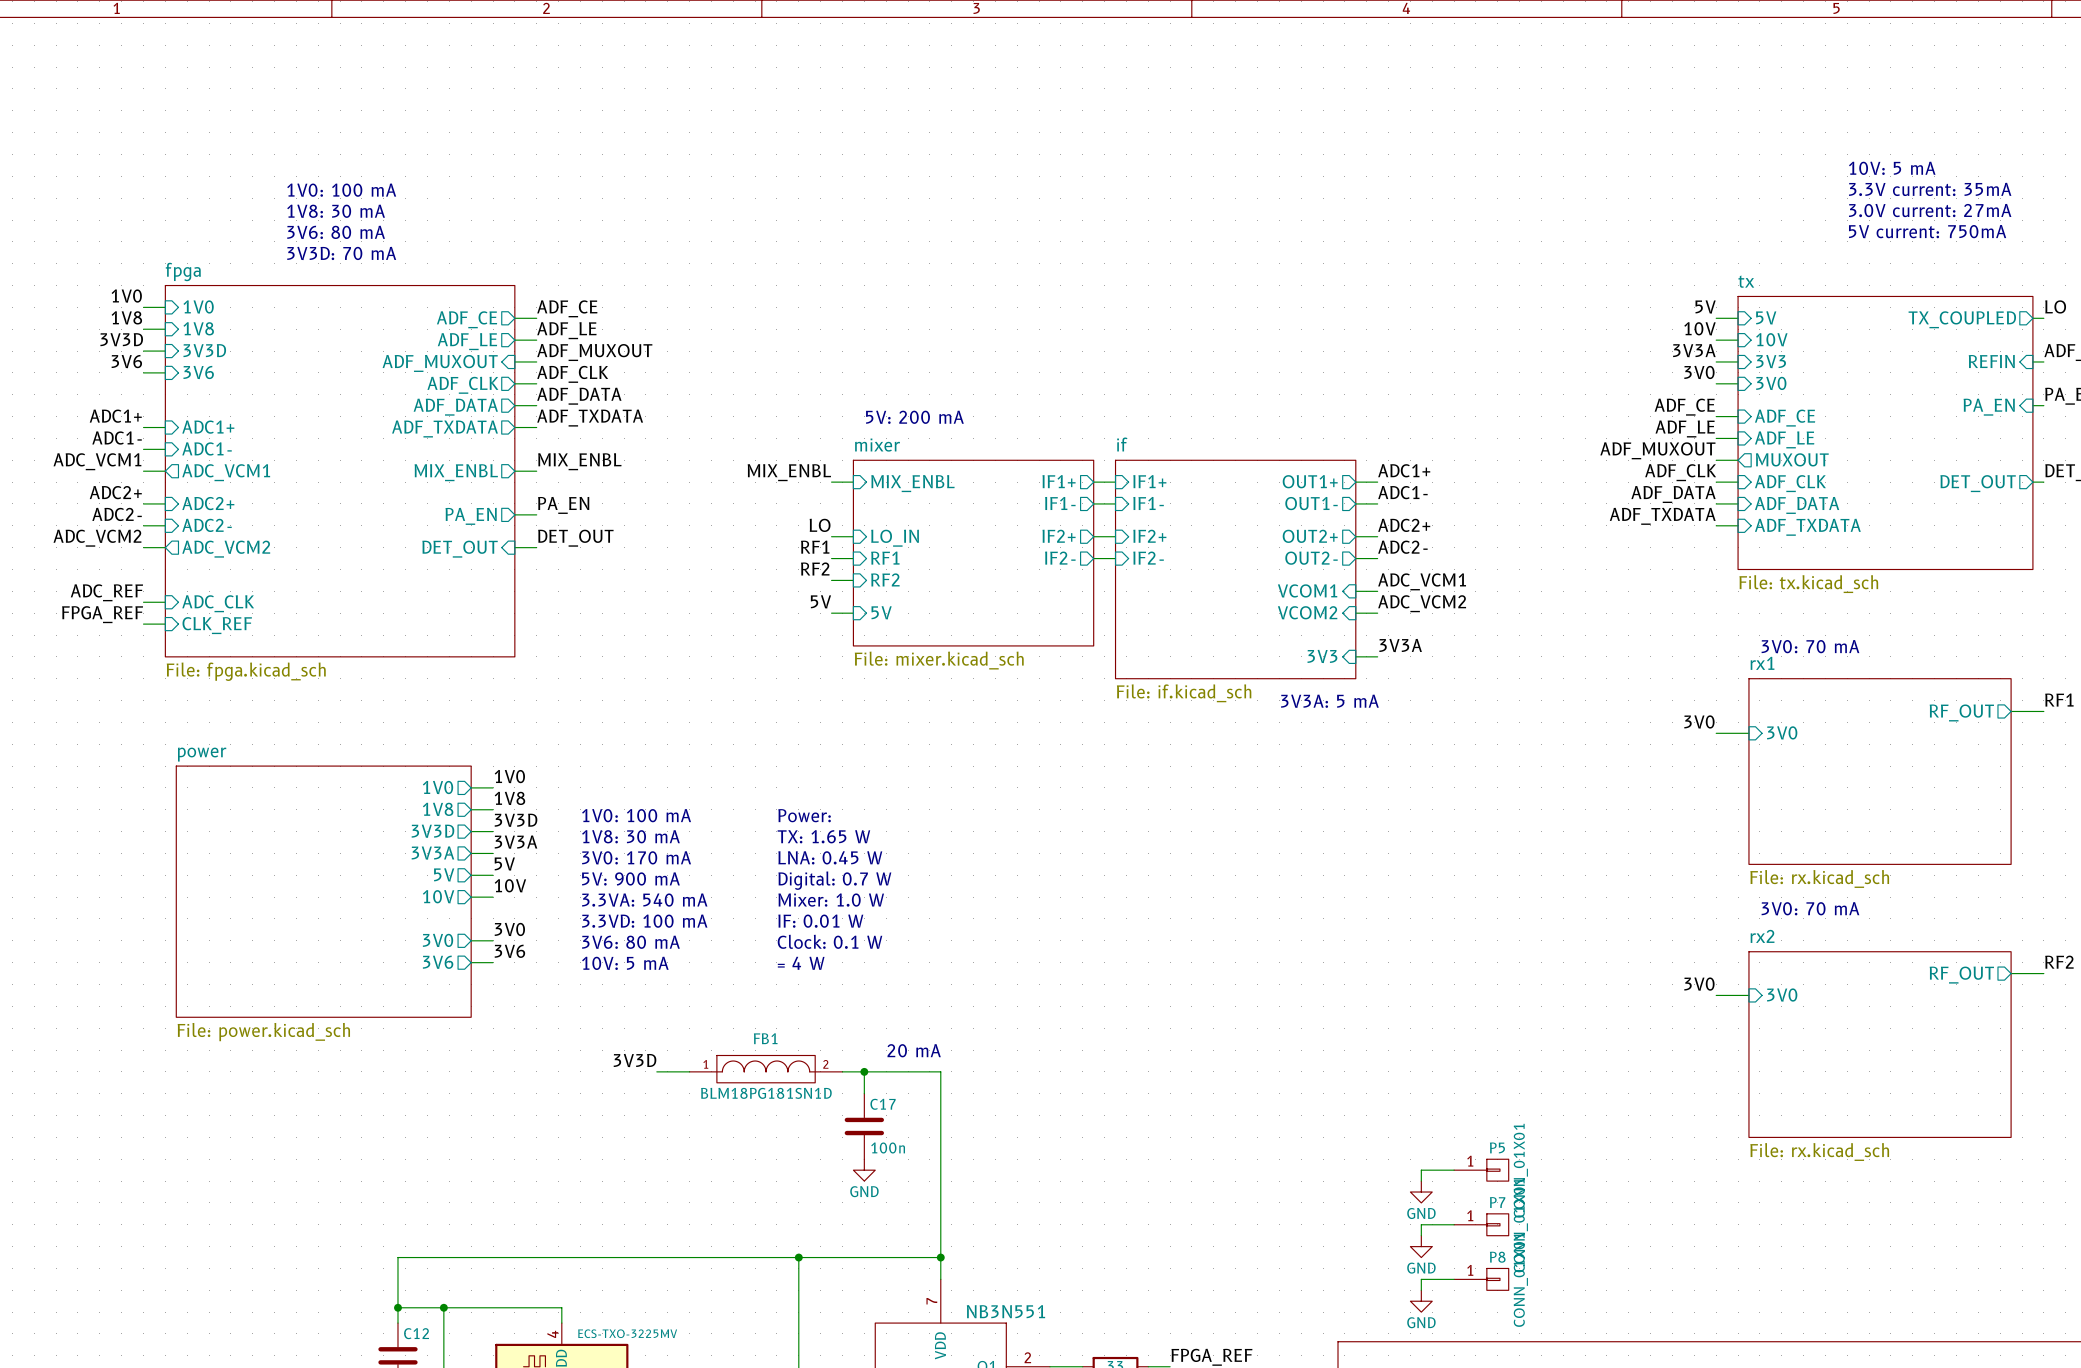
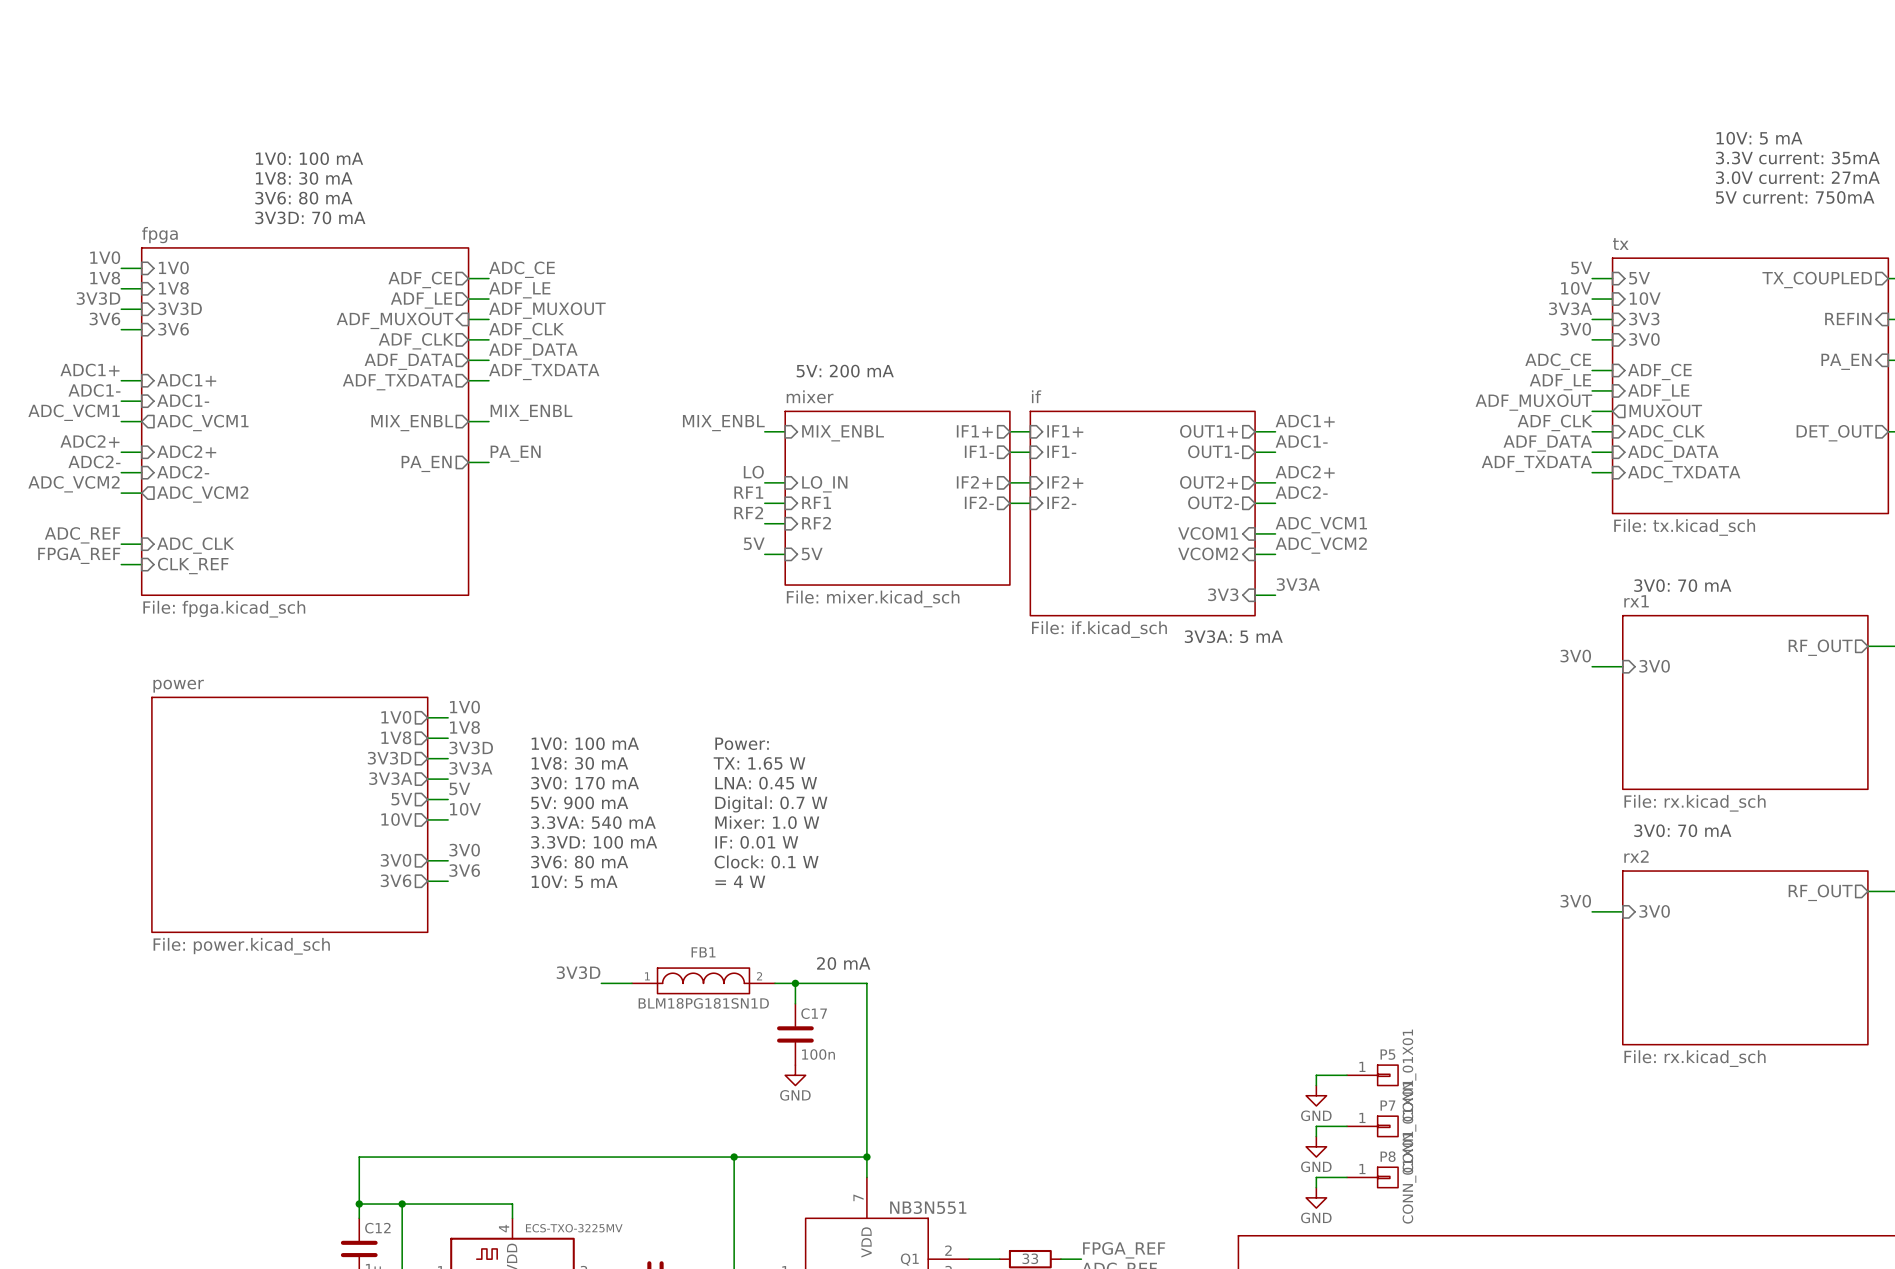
label: ADF_CE (567, 308) -> ADC_CE (521, 269)
label: ADF_CE (1684, 407) -> ADC_CE (1558, 361)
sheet pin: ADF_CLK (1790, 483) -> ADC_CLK (1666, 433)
sheet pin: ADF_DATA (1797, 505) -> ADC_DATA (1673, 453)
sheet pin: ADF_TXDATA (1807, 527) -> ADC_TXDATA (1684, 474)
label: DET_OUT (575, 538) -> none
wire: (514, 547) (536, 547) -> none
sheet pin: DET_OUT (460, 549) -> none

